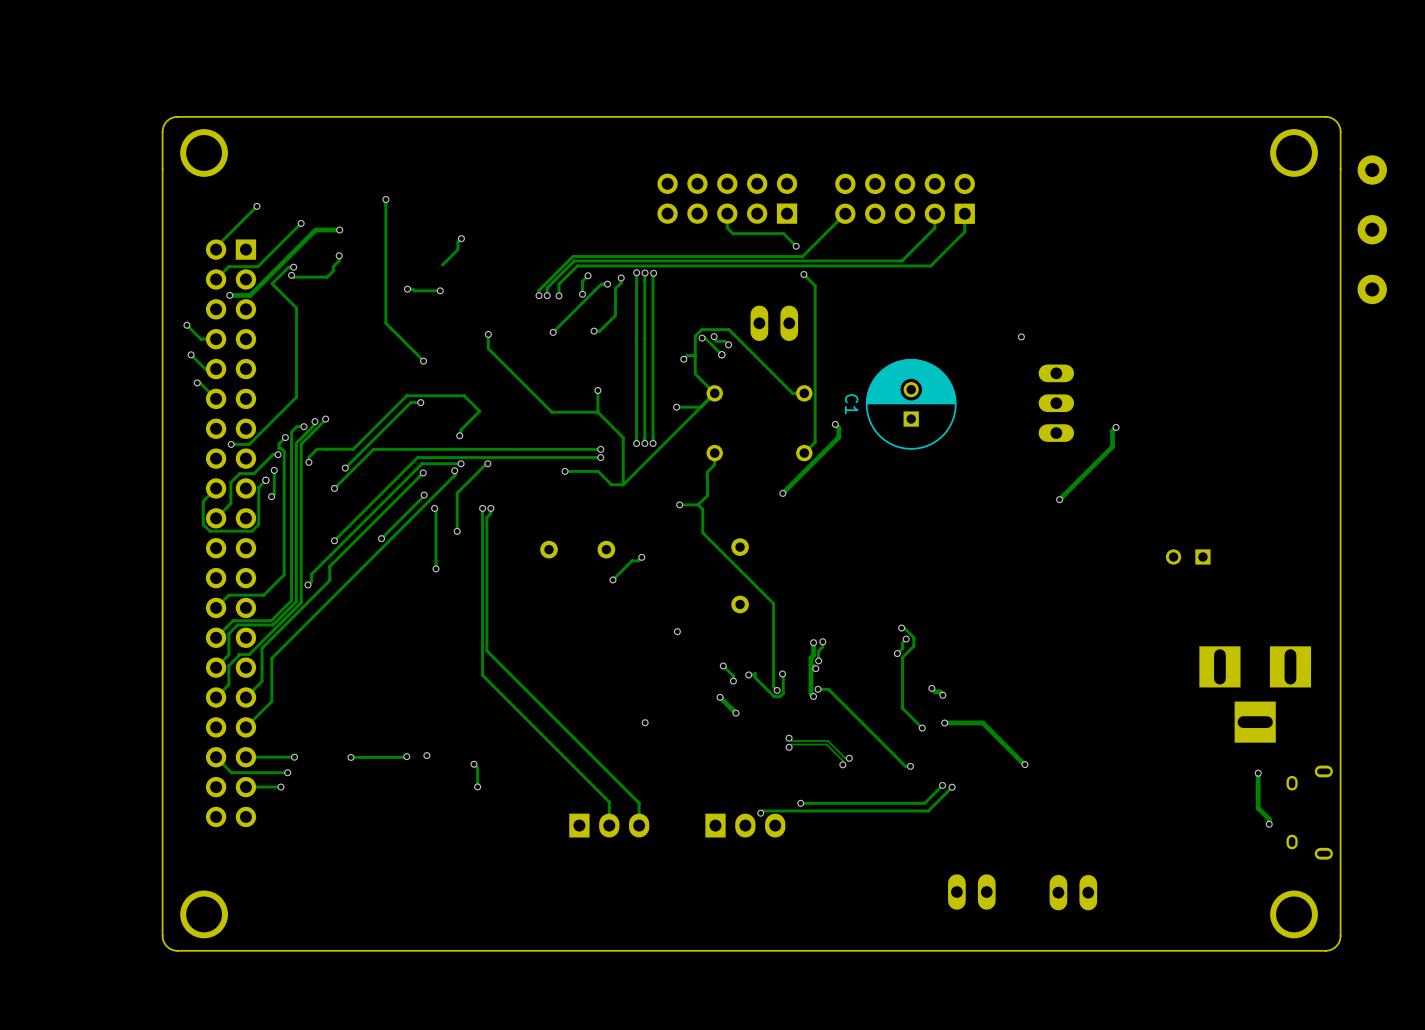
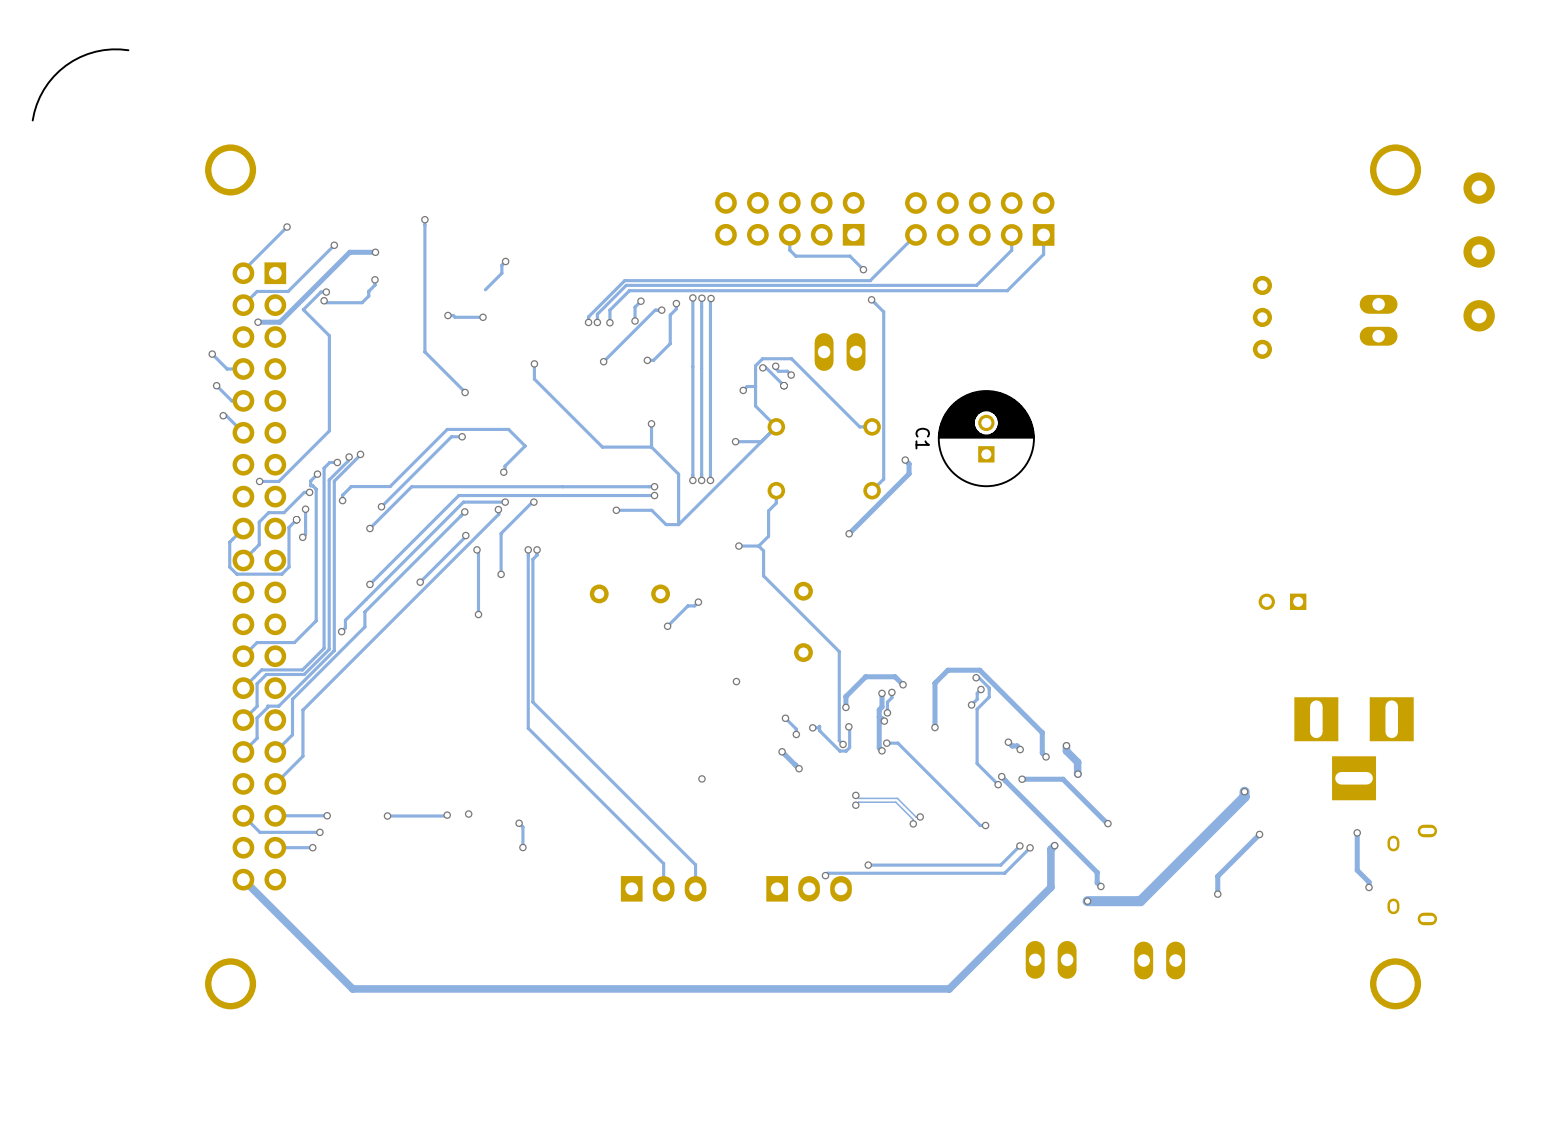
board edge: none -> (128, 50) (112, 49) (95, 51) (80, 57) (66, 65) (53, 76) (43, 89) (36, 104) (32, 120)
board edge: (1325, 116) (177, 116) (168, 119) (164, 124) (162, 131) (162, 935) (165, 944) (171, 949) (177, 950) (1325, 950) (1334, 947) (1338, 943) (1340, 935) (1340, 131) (1336, 121) (1325, 116) -> none
part: none -> (1262, 317)
part: none -> (1378, 320)
via: (1021, 336) -> none
part: (1056, 403) -> none
track: (1116, 427) (1112, 430) (1112, 446) (1059, 499) -> none
via: (1116, 427) -> none
via: (1059, 499) -> none
track: none -> (903, 684) (895, 676) (865, 676) (845, 696) (845, 707)
via: none -> (903, 684)
via: none -> (845, 707)
track: none -> (934, 727) (934, 683) (947, 670) (979, 670) (1042, 732) (1042, 753) (1046, 756)
via: none -> (934, 727)
track: none -> (1066, 745) (1066, 751) (1077, 762) (1077, 774)
via: none -> (1066, 745)
via: none -> (1046, 756)
via: none -> (1077, 774)
track: none -> (1001, 776) (1097, 872) (1097, 882) (1100, 886)
via: none -> (1001, 776)
track: none -> (1244, 791) (1244, 797) (1140, 901) (1087, 901)
via: none -> (1244, 791)
track: none -> (1259, 834) (1217, 876) (1217, 894)
via: none -> (1259, 834)
track: none -> (1054, 845) (1050, 849) (1050, 887) (949, 988) (352, 988) (243, 879)
via: none -> (1054, 845)
via: none -> (1100, 886)
via: none -> (1217, 894)
via: none -> (1087, 901)

